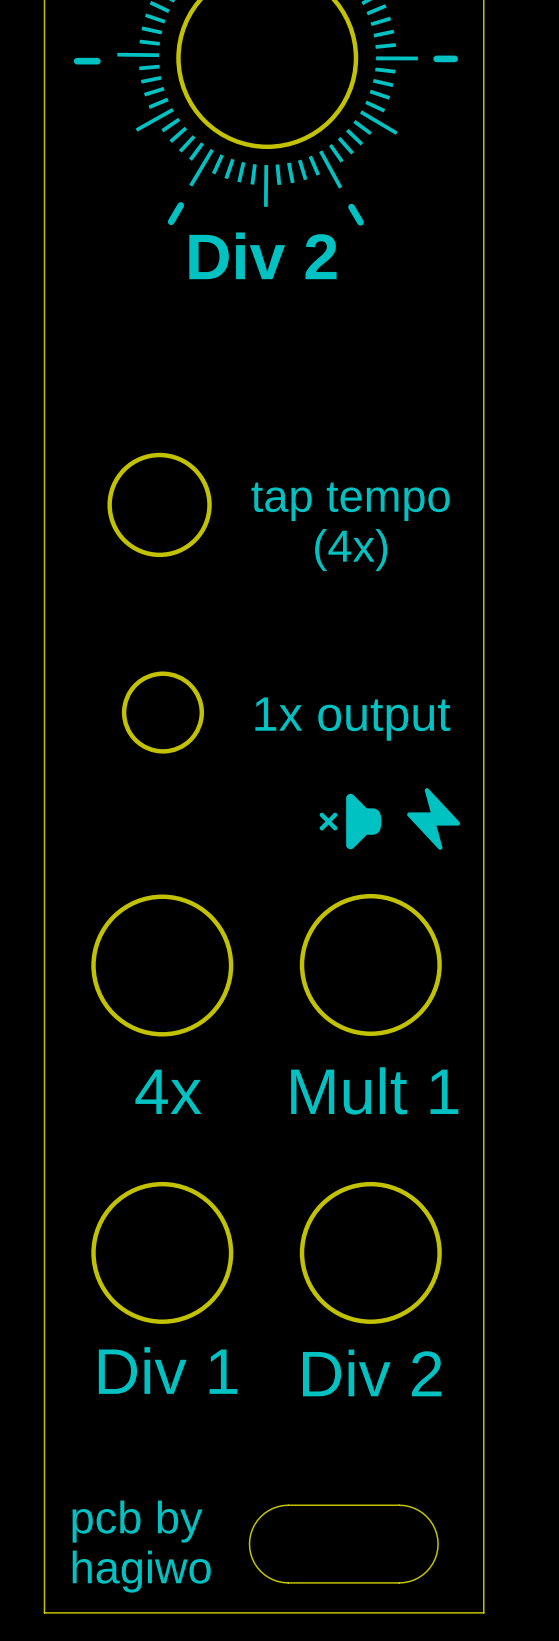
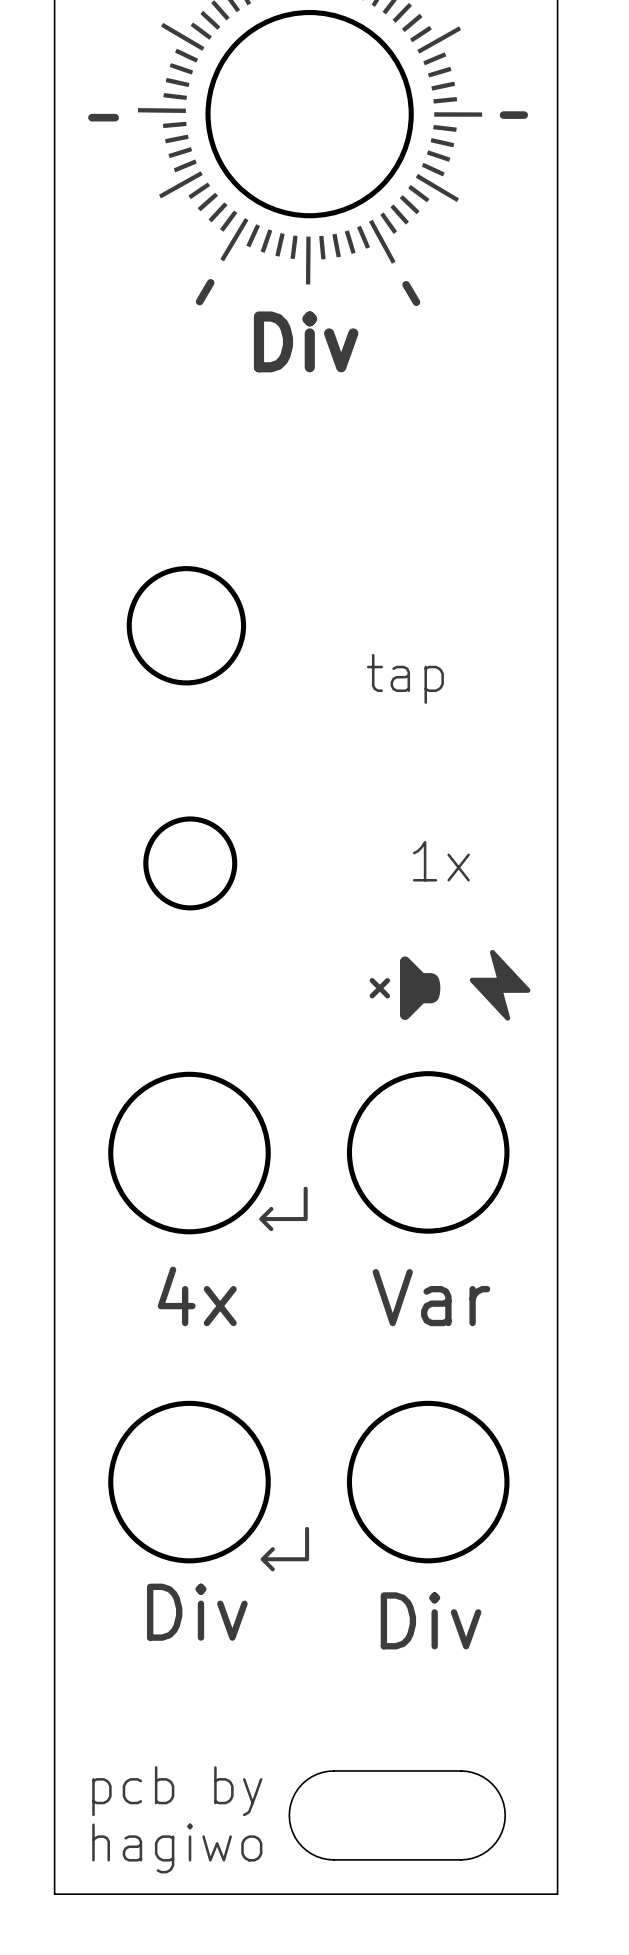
text: Div 2 (262, 255) -> Div (306, 341)
text: tap tempo (350, 501) -> none
text: (4x) (351, 550) -> none
text: none -> tap (405, 678)
text: none -> 1x (441, 861)
text: 1x output (352, 719) -> none
drawing: none -> [259, 1186, 308, 1232]
text: Mult 1 (374, 1090) -> Var (431, 1297)
drawing: none -> [260, 1526, 310, 1572]
text: Div 1 (168, 1370) -> Div (197, 1612)
text: Div 2 (372, 1372) -> Div (431, 1620)

